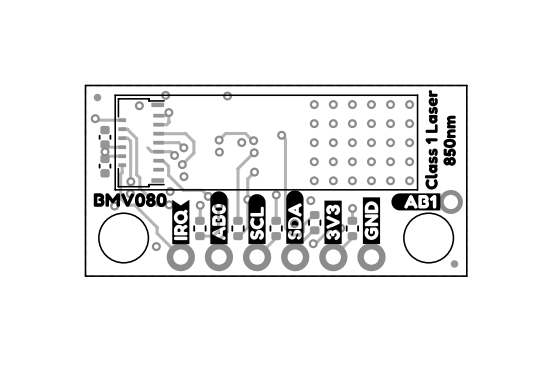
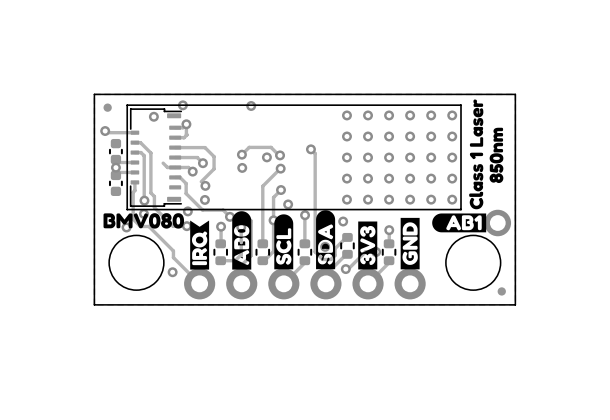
via: (182, 164) -> none
via: none -> (205, 185)
via: (183, 176) -> none
via: none -> (204, 199)
via: none -> (288, 204)

